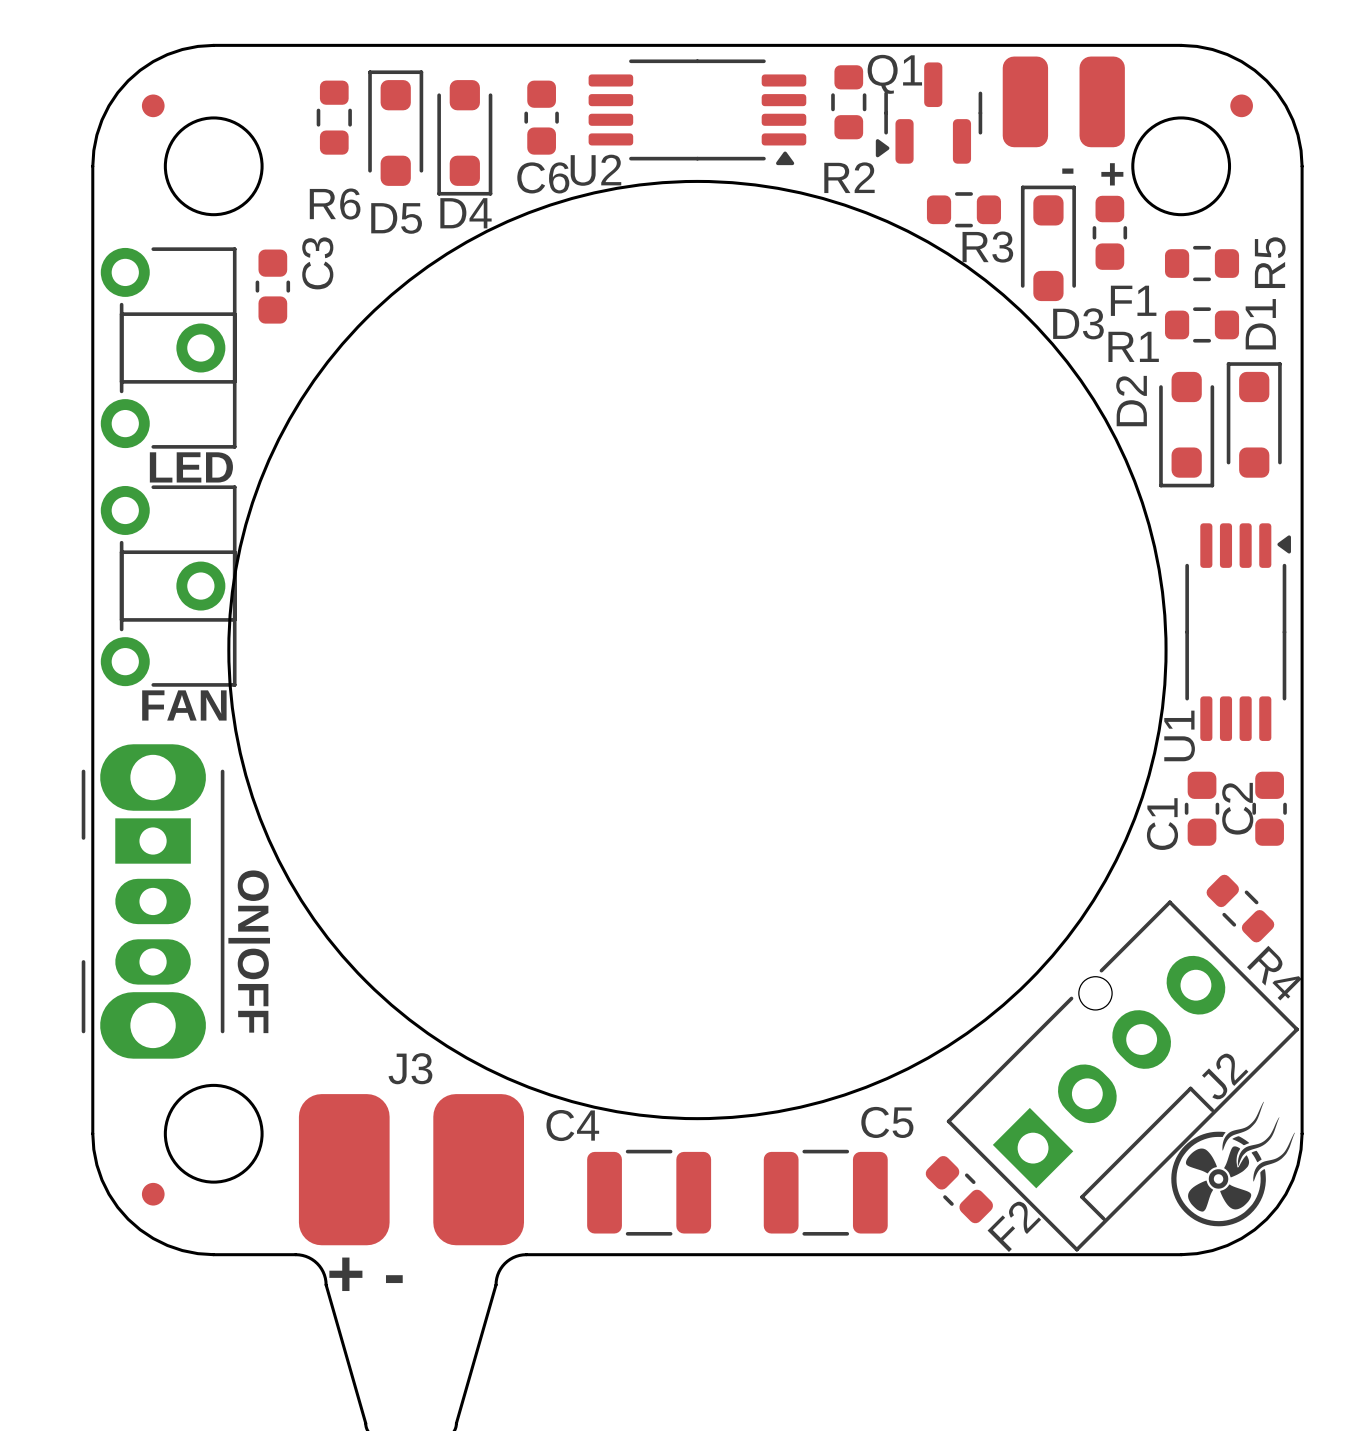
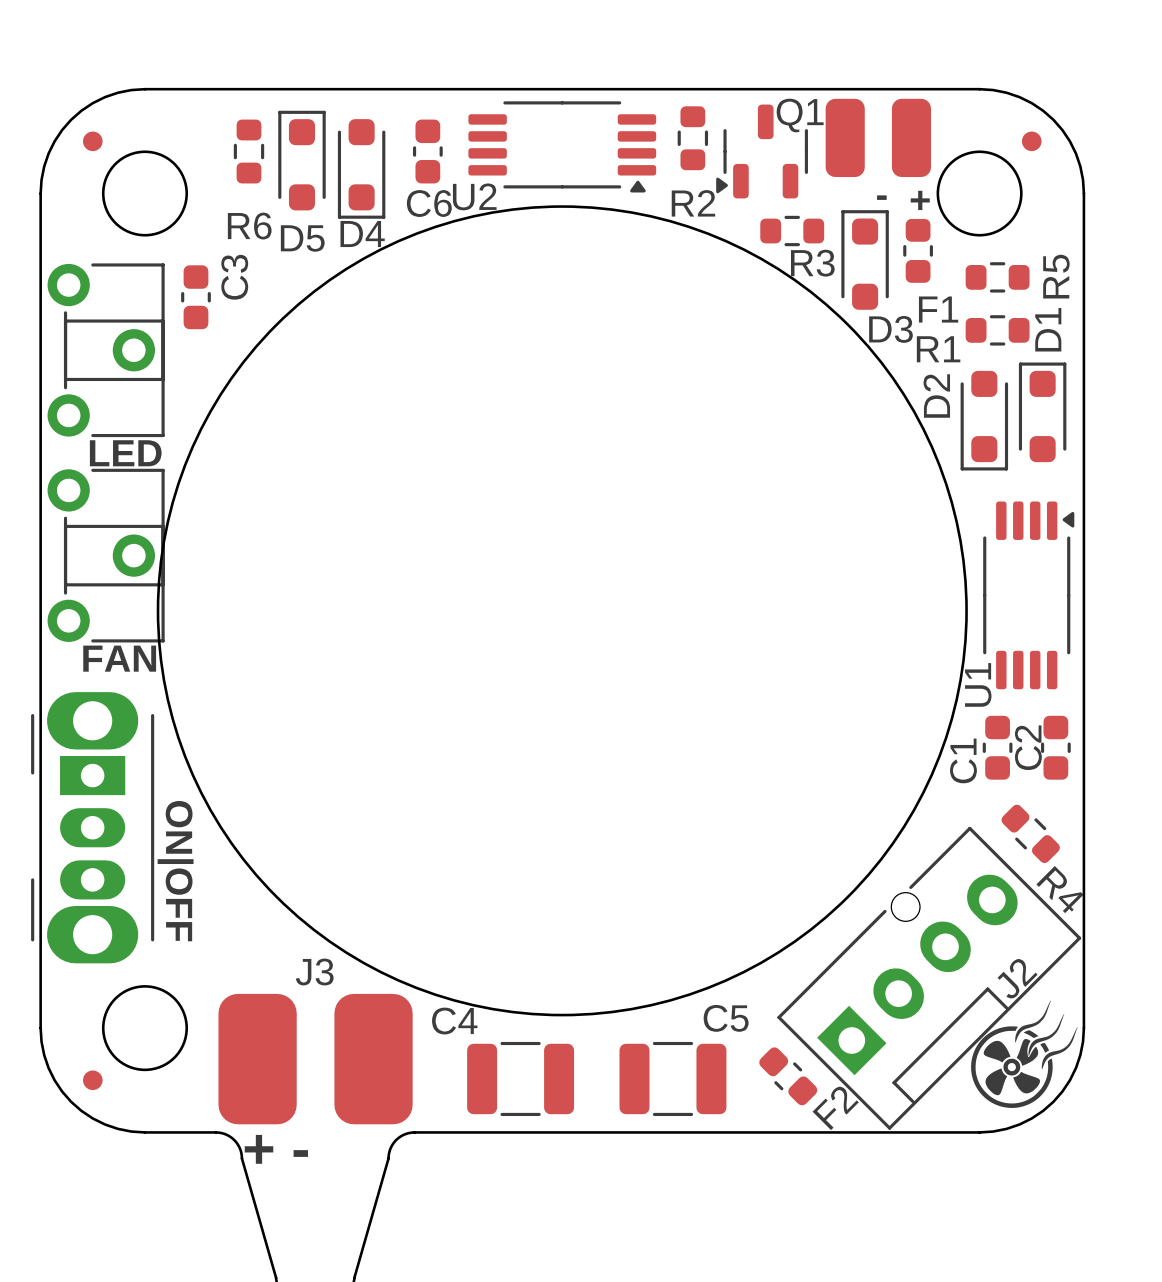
Q1 footprint: [875, 62, 983, 164] -> [716, 104, 808, 199]
Q1 name position: Q1 (894, 74) -> Q1 (800, 115)

